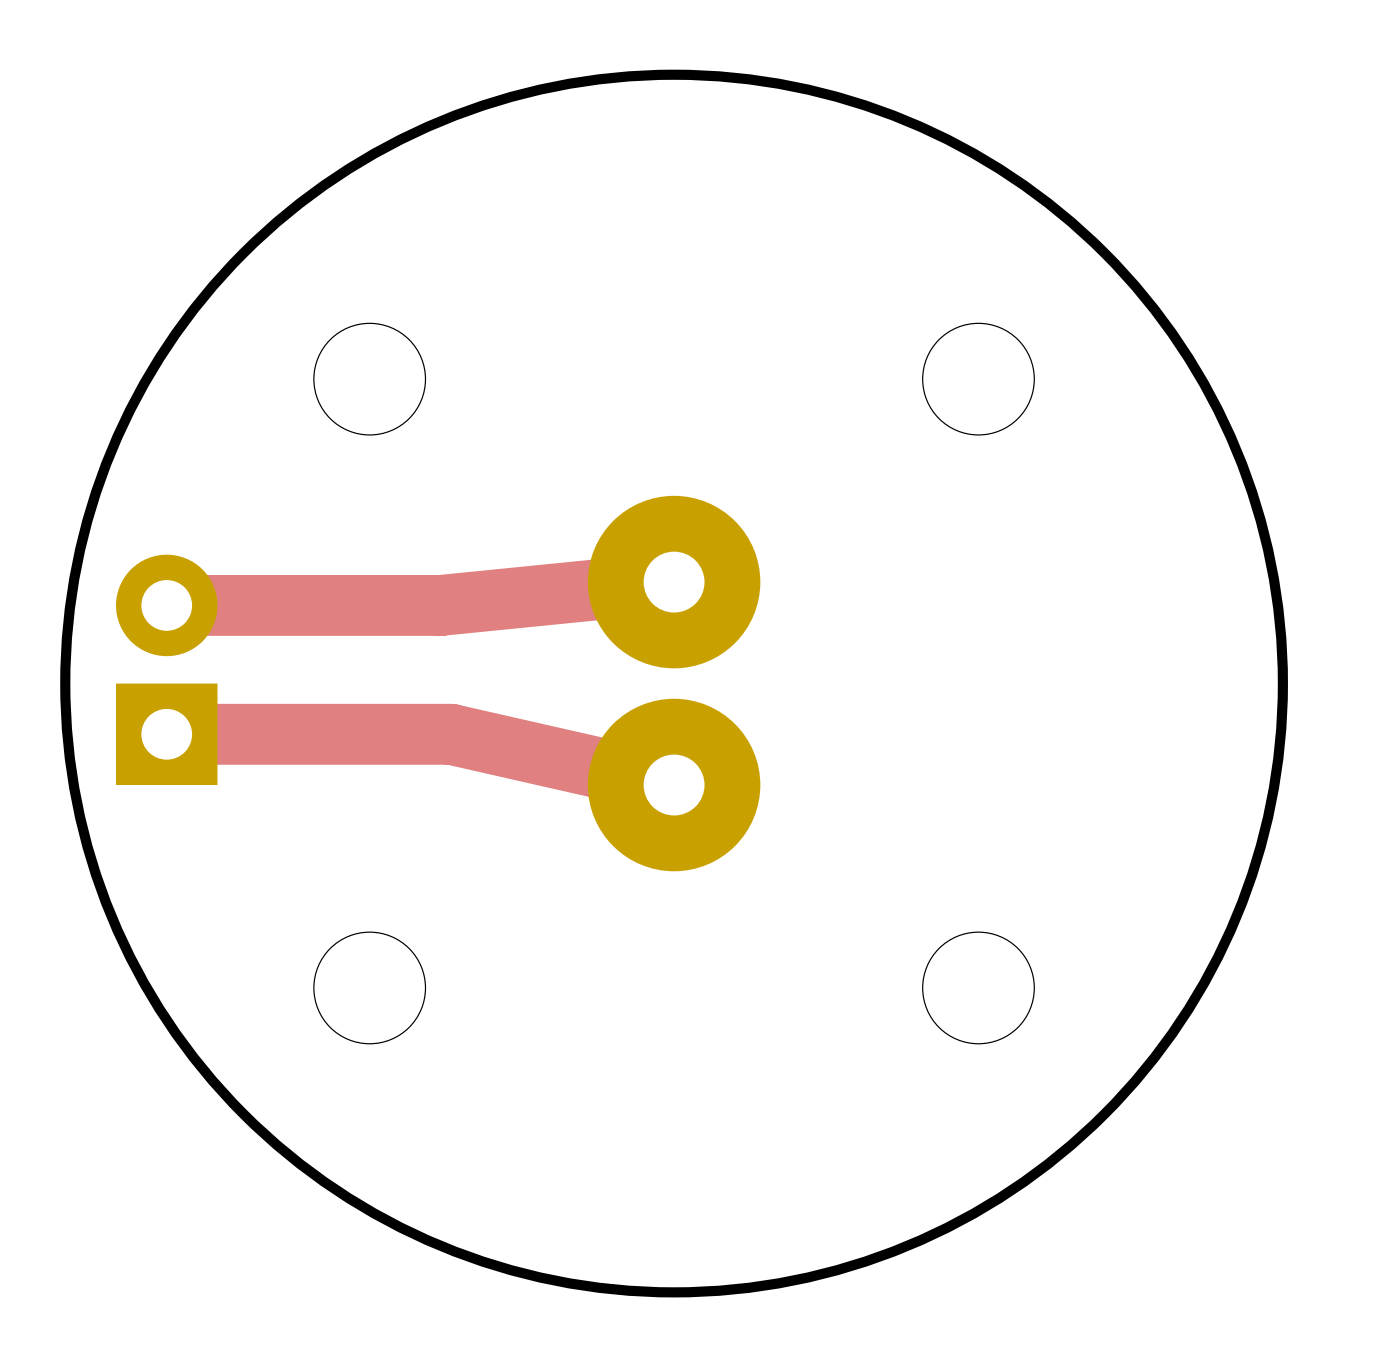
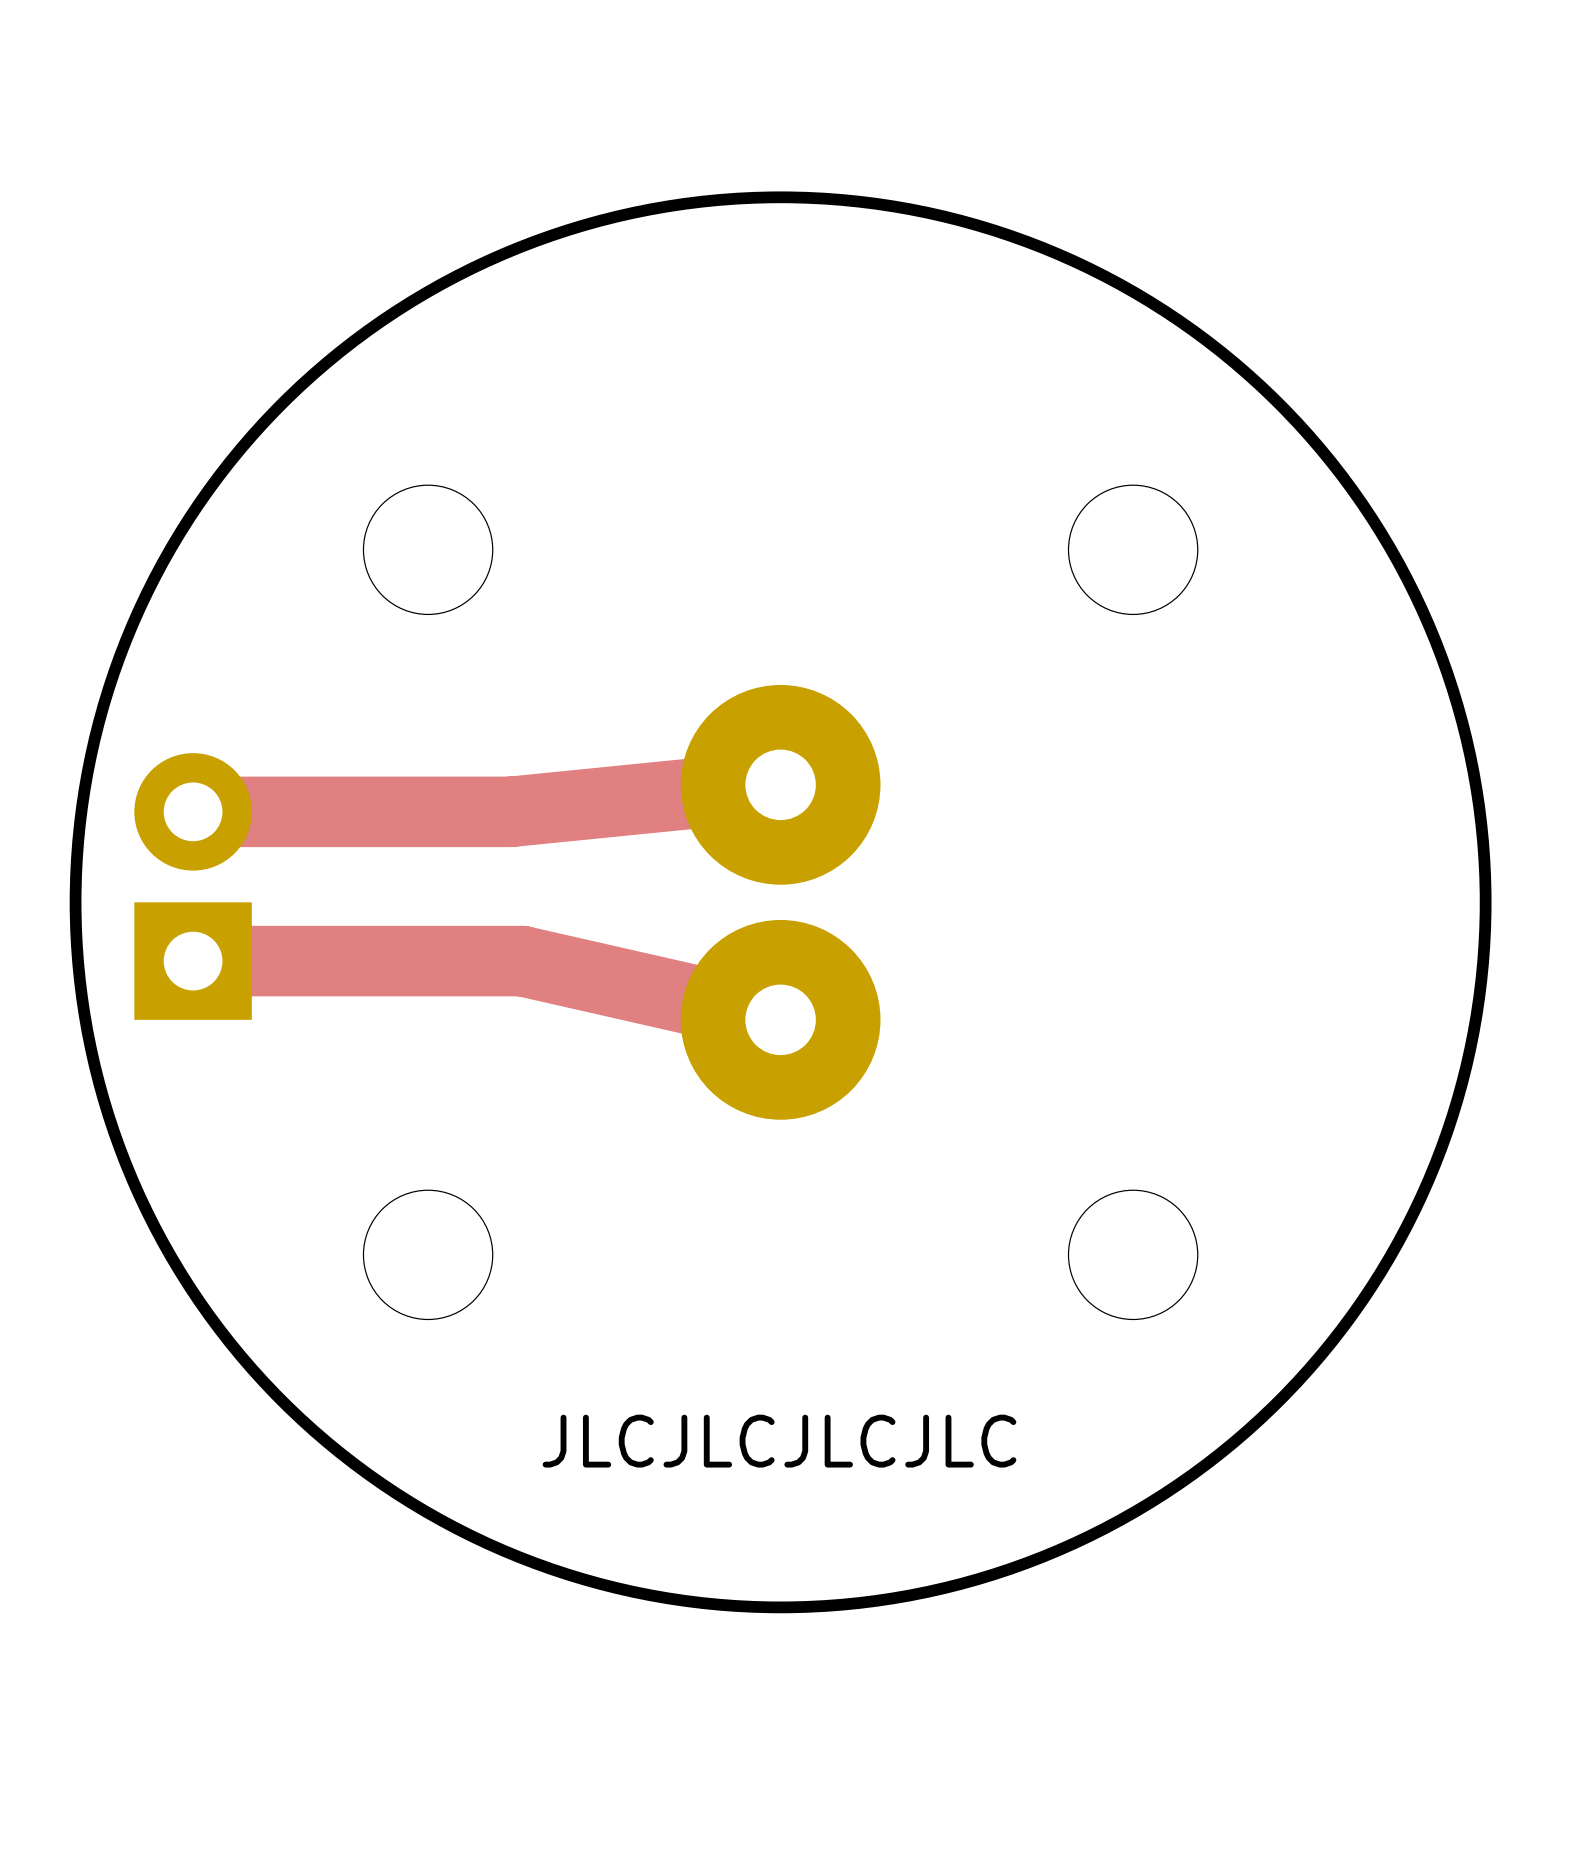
text: none -> JLCJLCJLCJLC (779, 1441)

